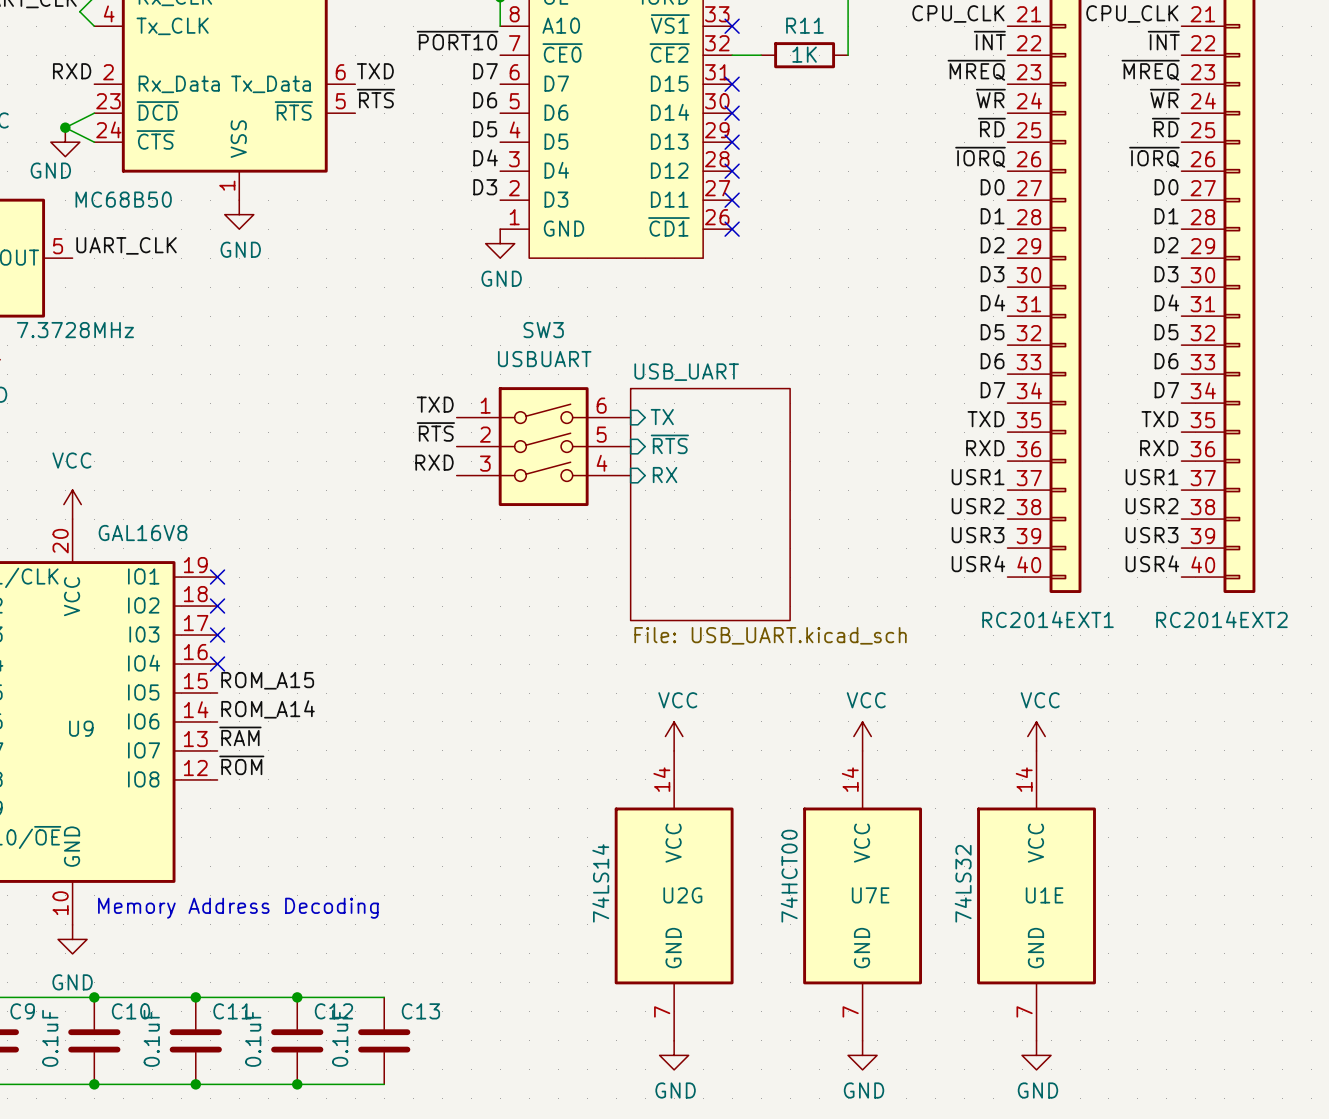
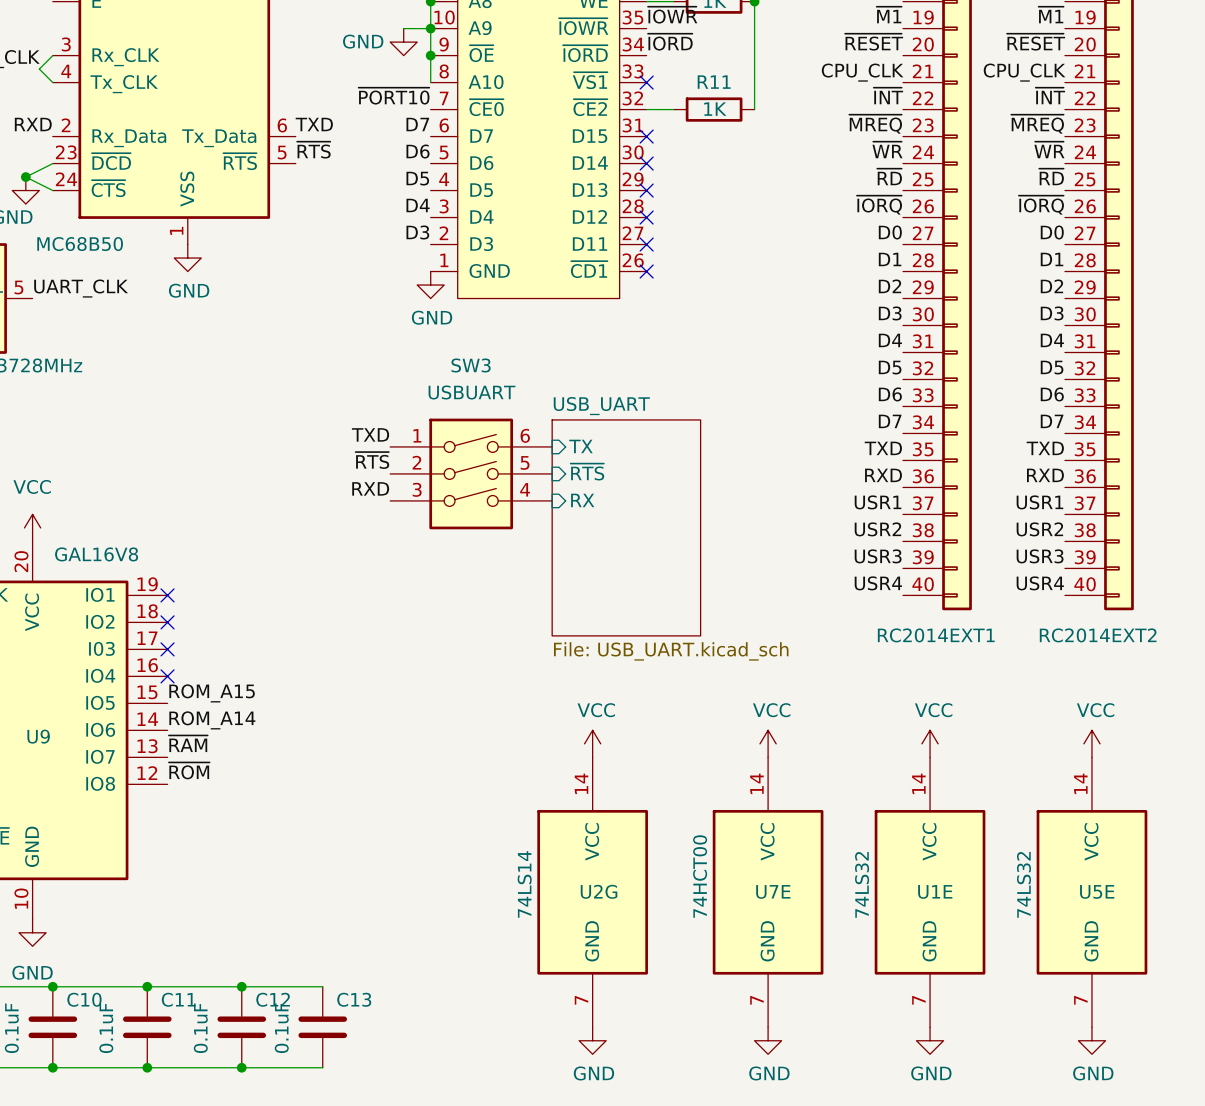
power symbol: none -> VCC (1091, 743)
U5E: none -> 74LS32 (1091, 892)
text: Memory Address Decoding (238, 908) -> none
power symbol: none -> GND (1091, 1040)

